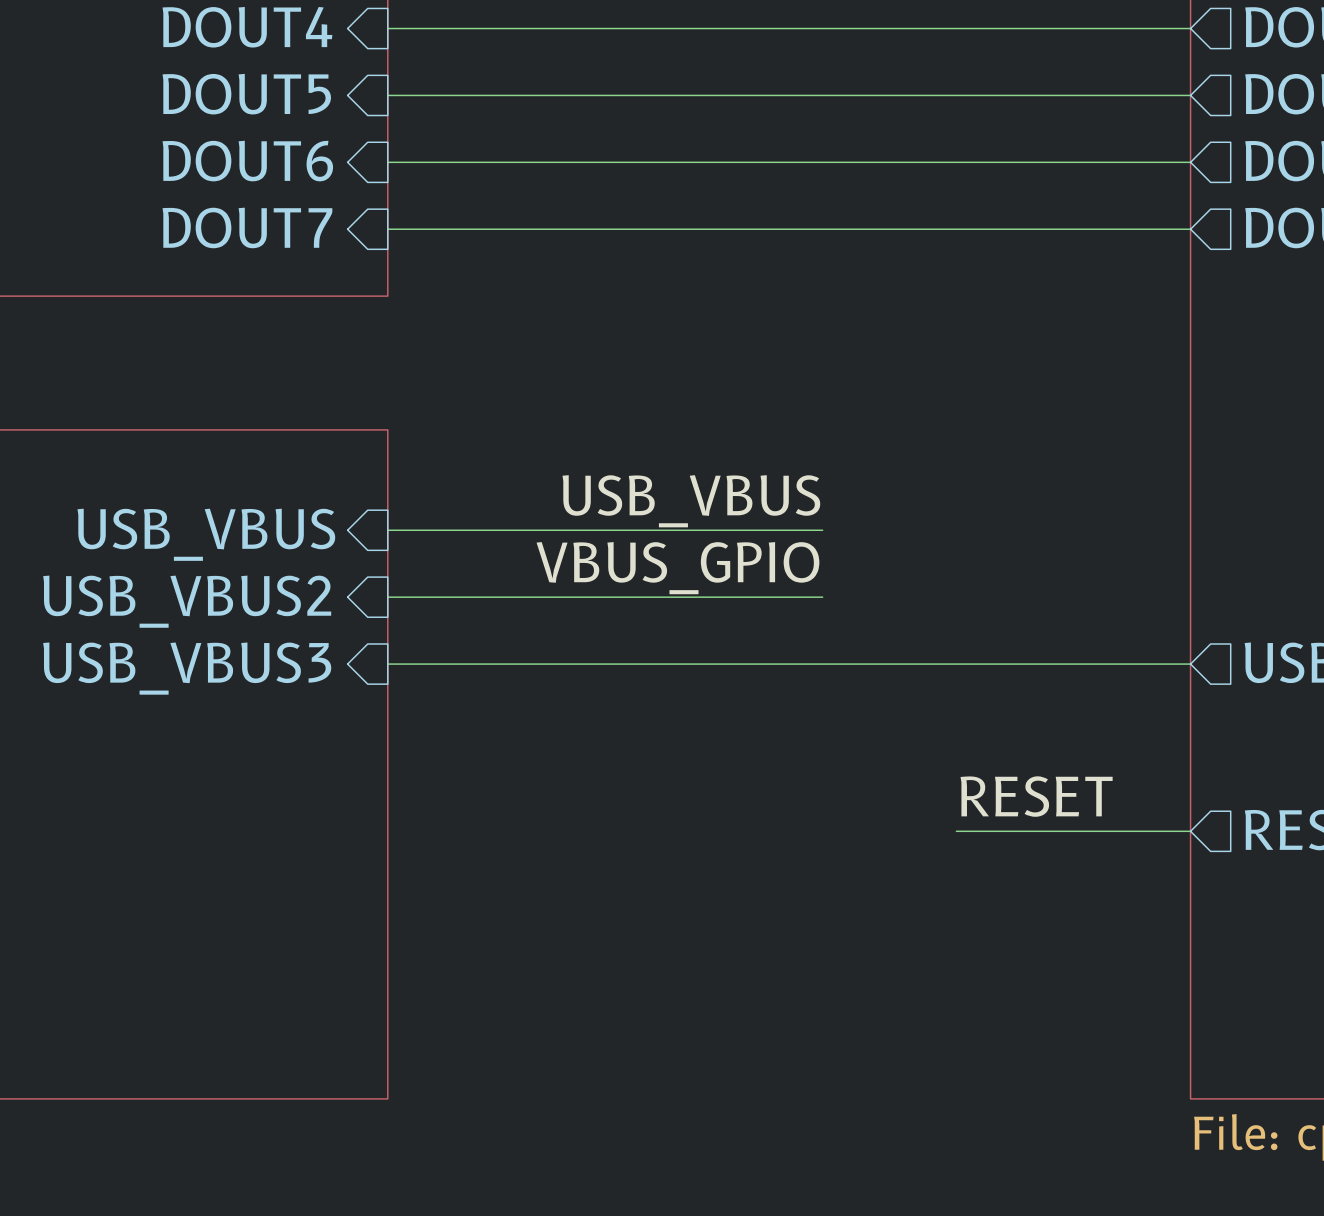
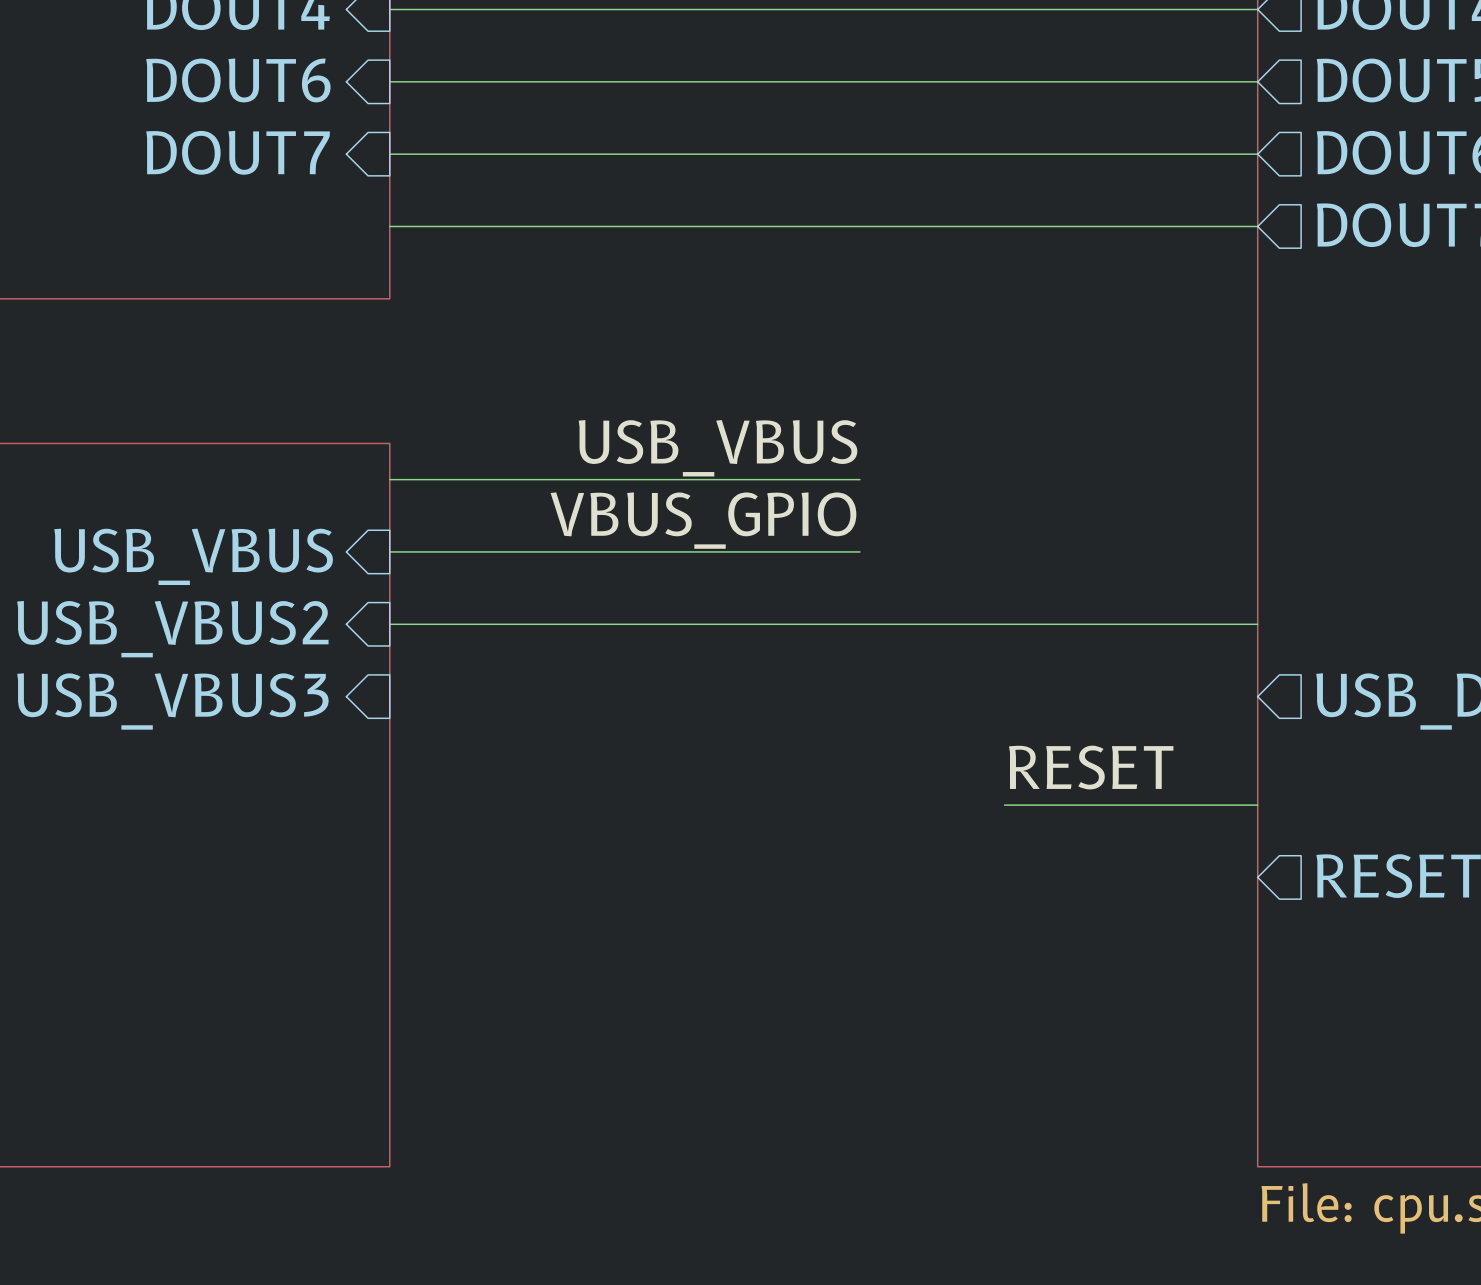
sheet pin: DOUT5 (246, 94) -> DOUT6 (238, 80)
sheet pin: DOUT6 (247, 161) -> DOUT7 (238, 152)
sheet pin: DOUT7 (247, 227) -> none
label: none -> USB_VBUS (717, 448)
wire: none -> (389, 479) (859, 479)
label: USB_VBUS (691, 501) -> VBUS_GPIO (703, 520)
label: VBUS_GPIO (677, 568) -> none
wire: none -> (859, 624) (1257, 624)
wire: (387, 664) (1190, 664) -> none
label position: RESET (1036, 796) -> RESET (1091, 767)
wire: (956, 831) (1190, 831) -> (1004, 805) (1257, 805)

